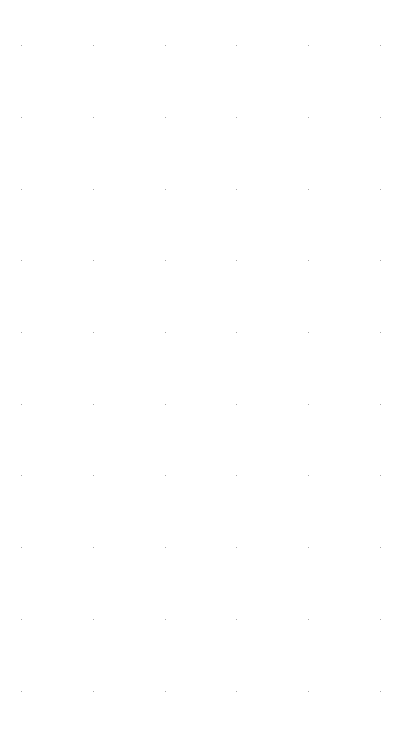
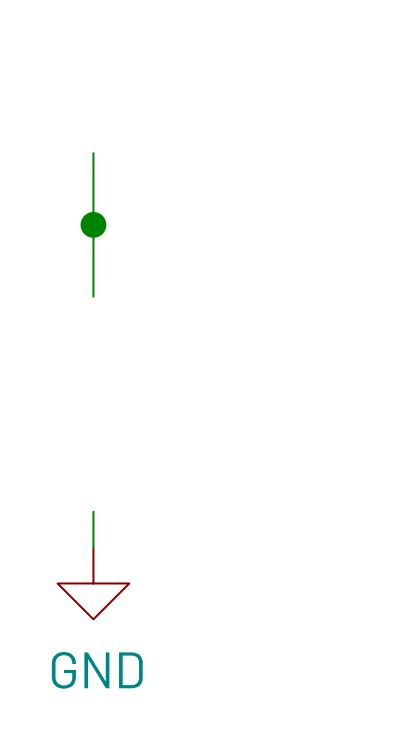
wire: none -> (93, 153) (93, 296)
junction: none -> (93, 224)
wire: none -> (93, 511) (93, 547)
power symbol: none -> GND (93, 583)

